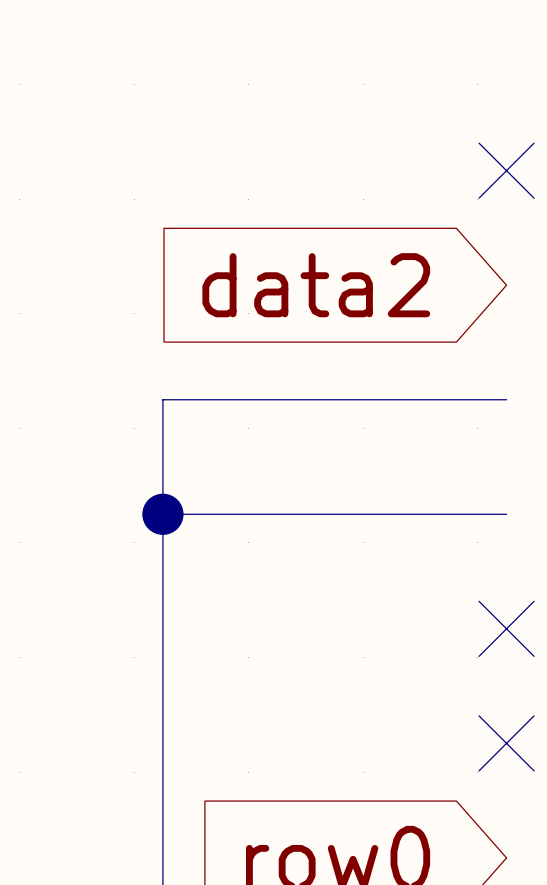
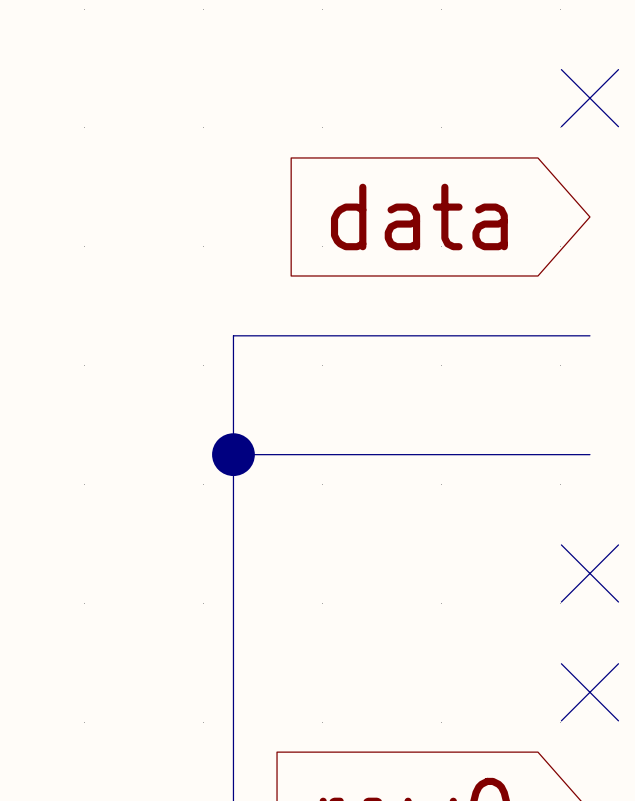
global label: data2 (316, 285) -> data (419, 216)

